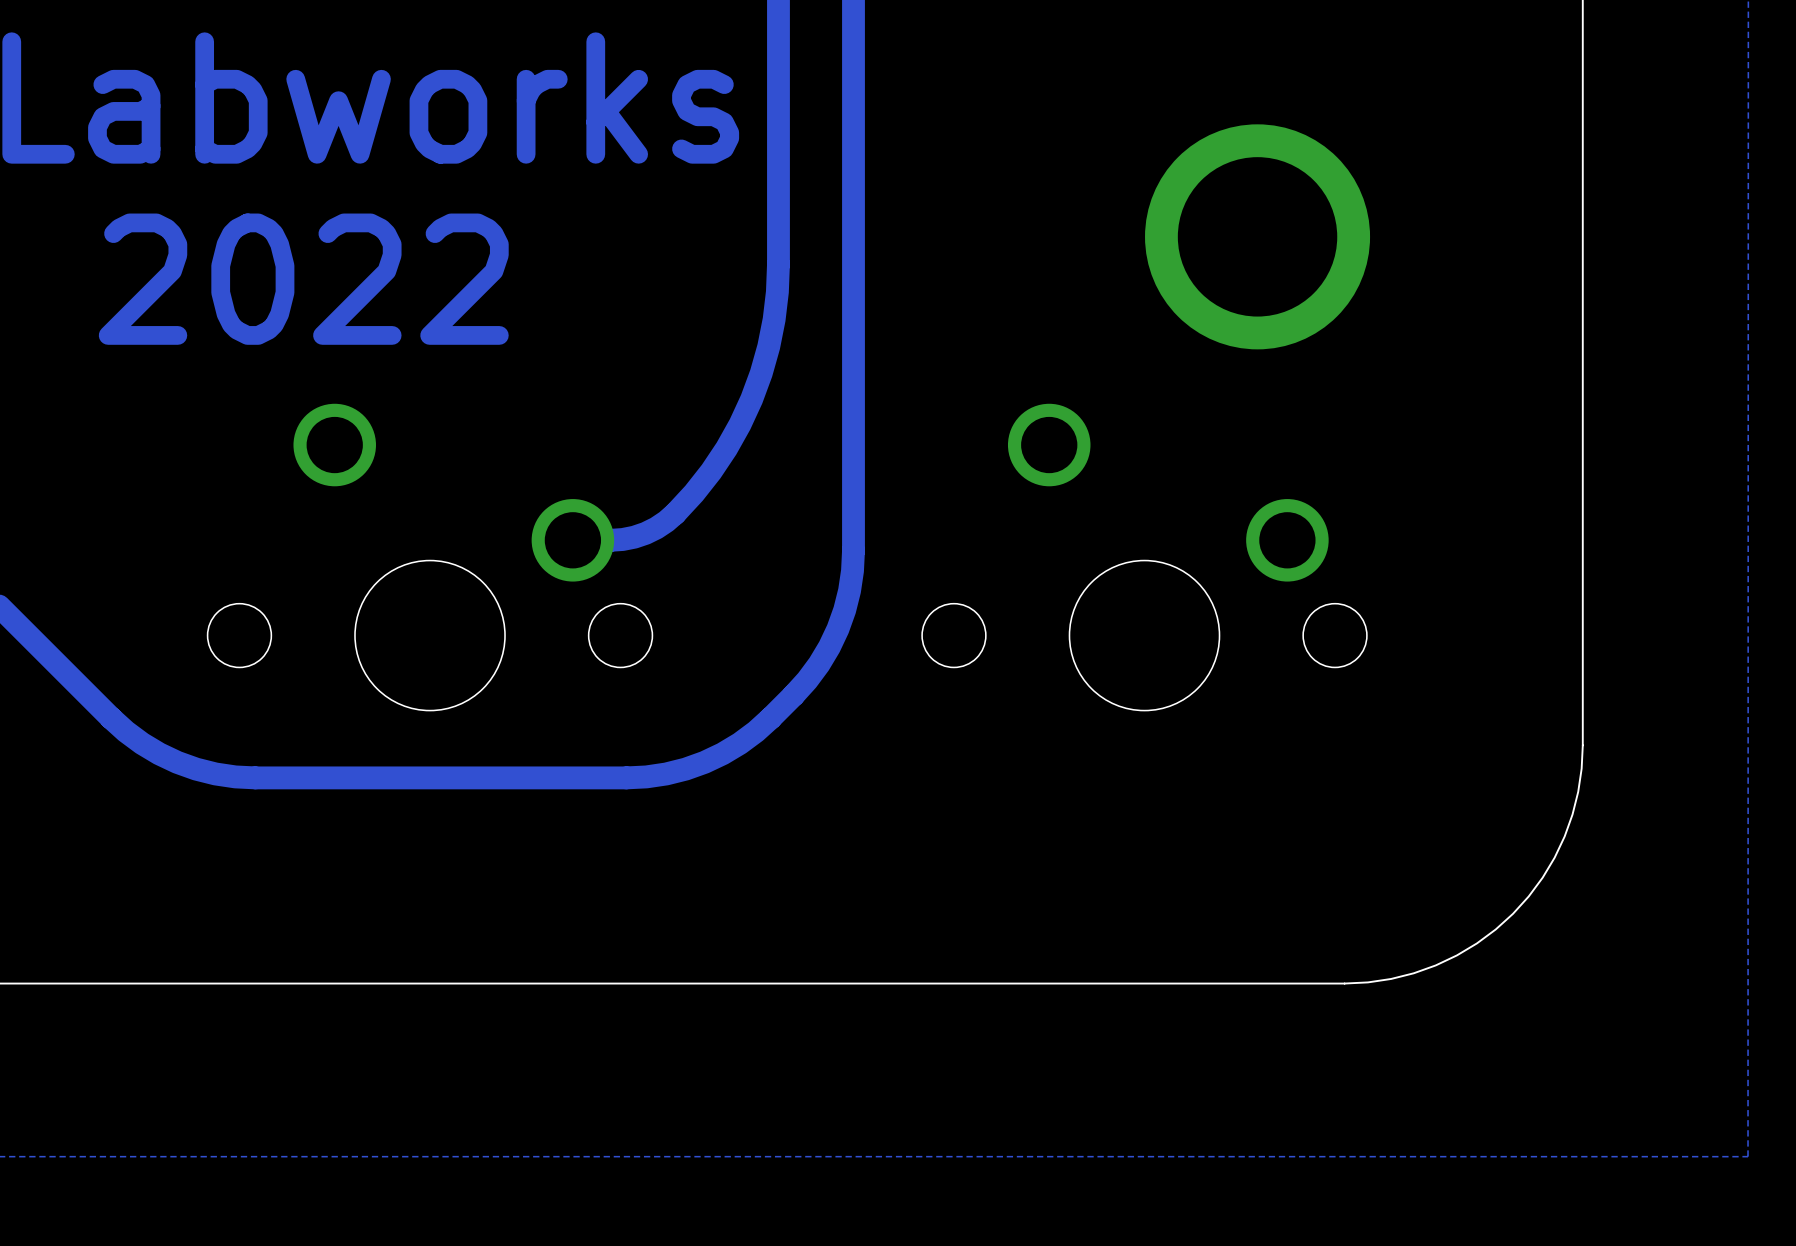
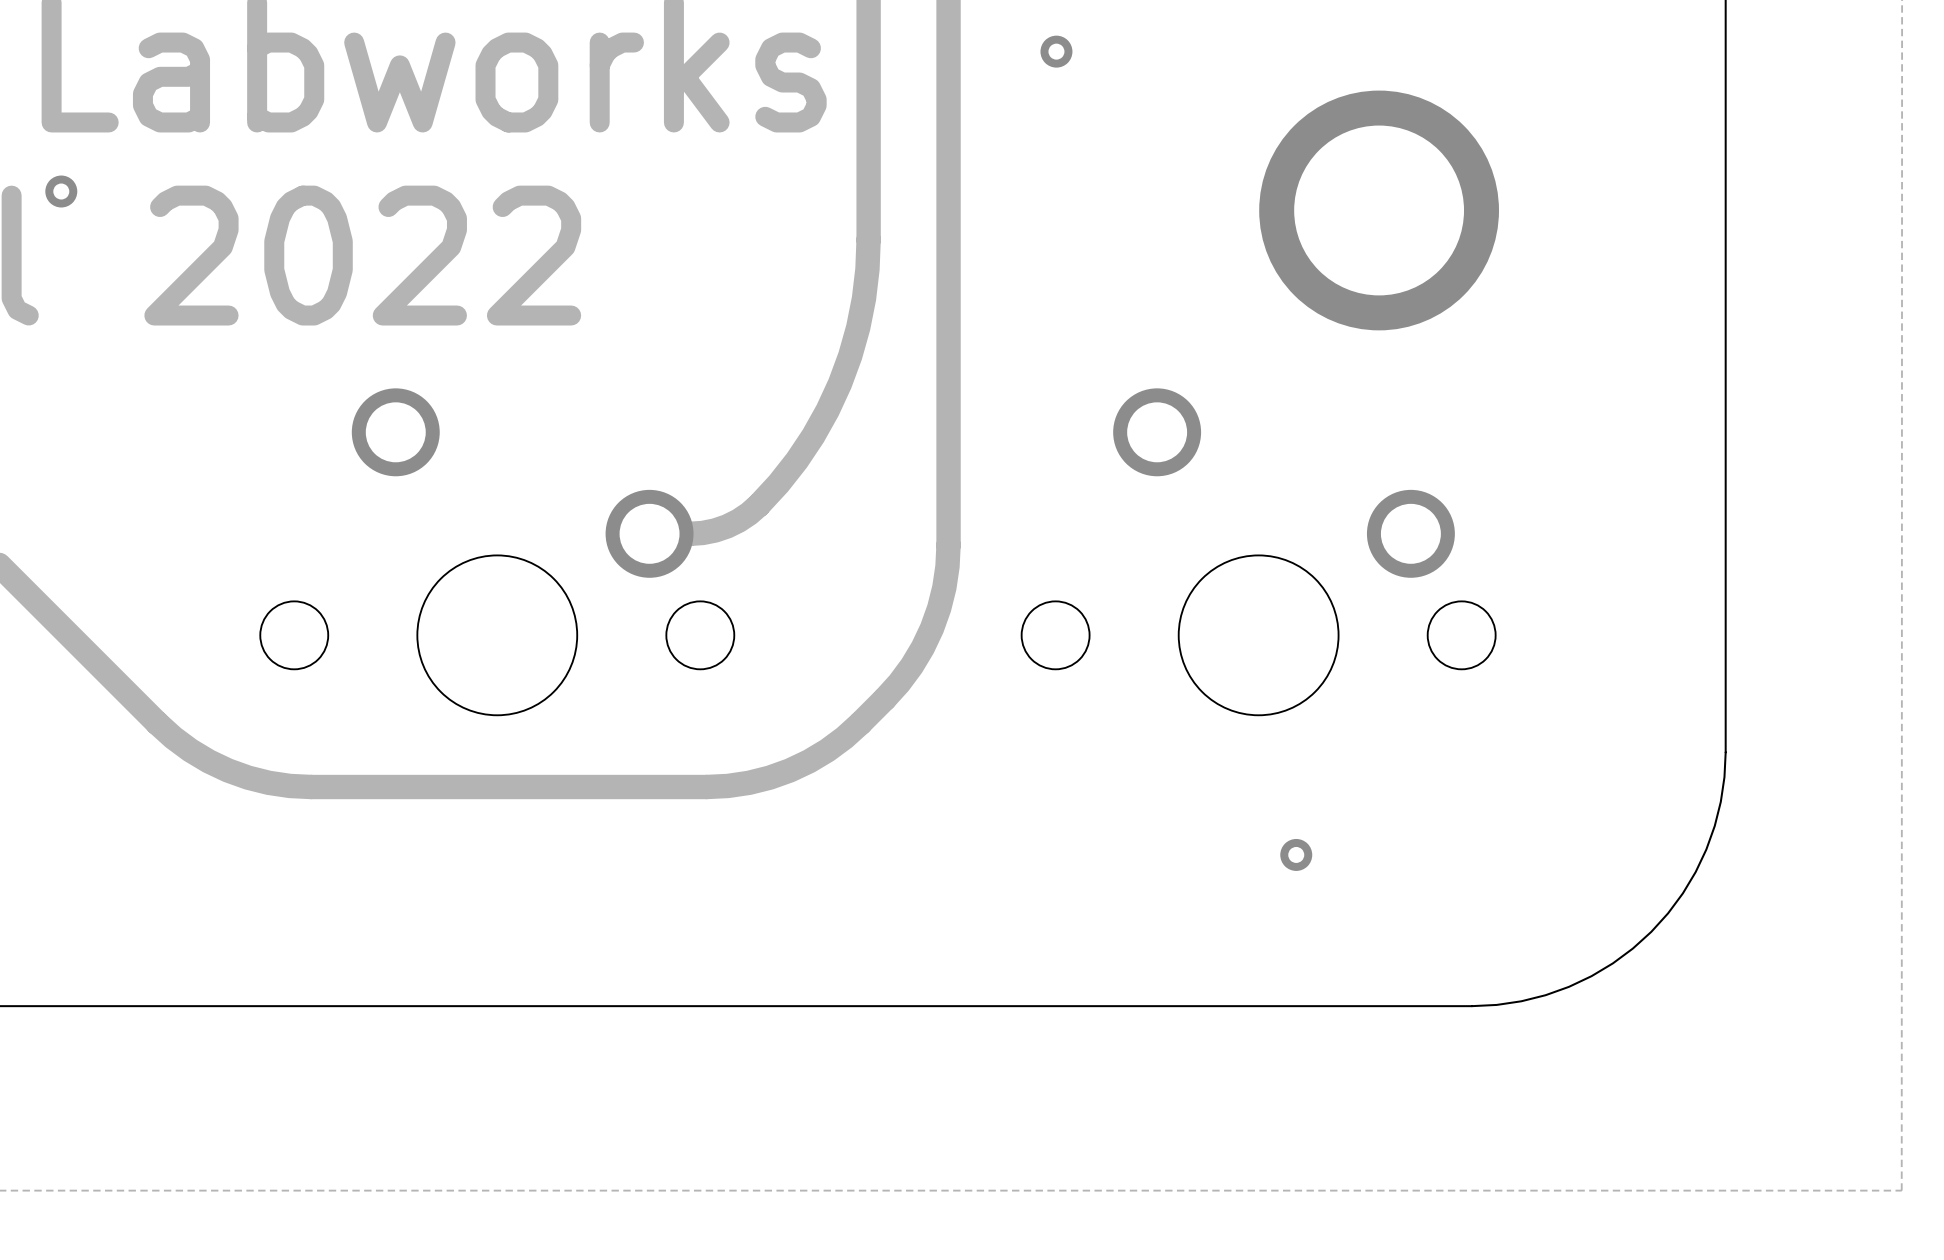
via: none -> (1056, 51)
via: none -> (61, 191)
via: none -> (1296, 854)

